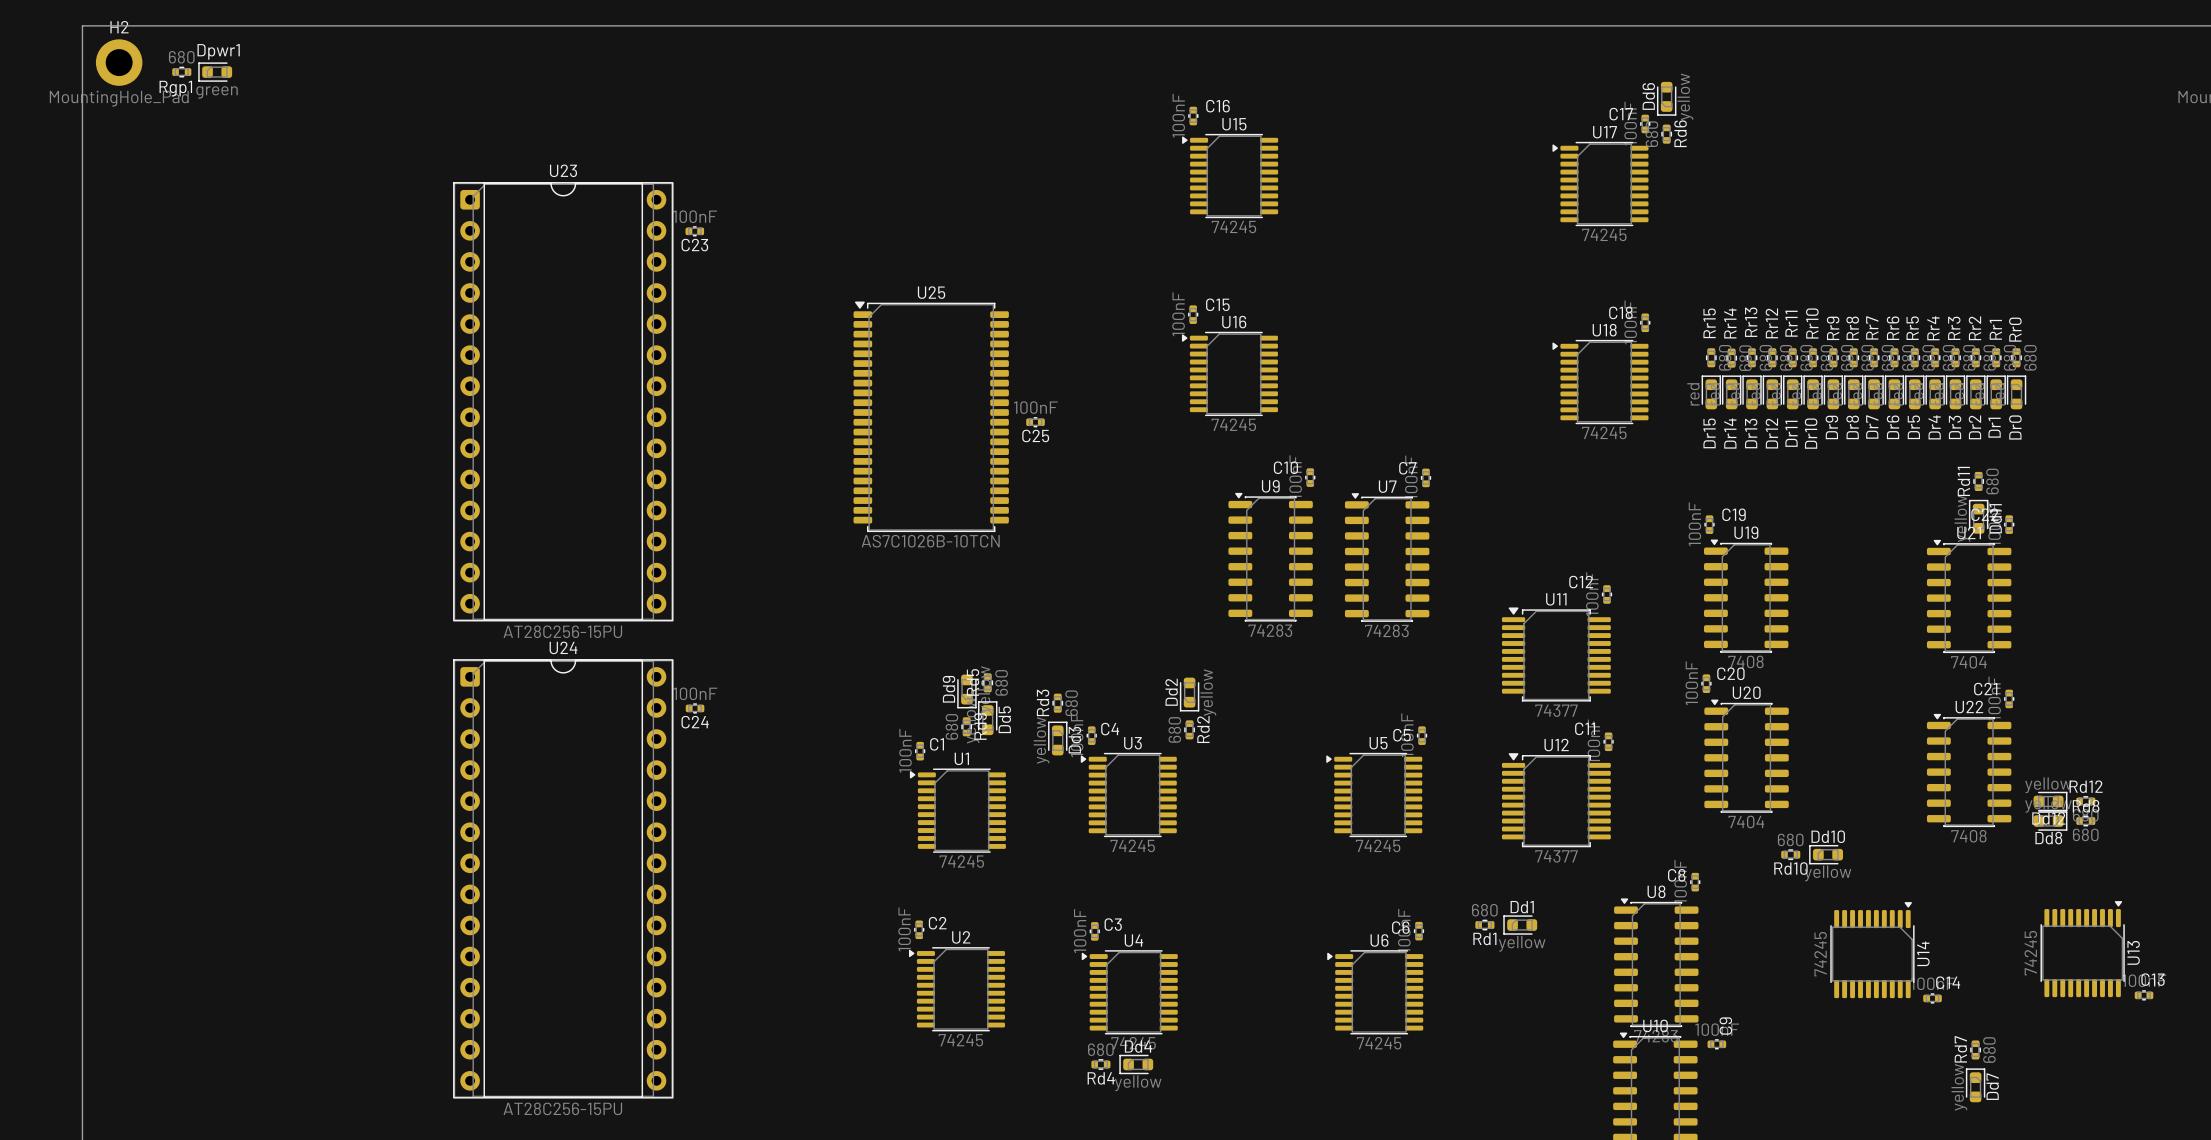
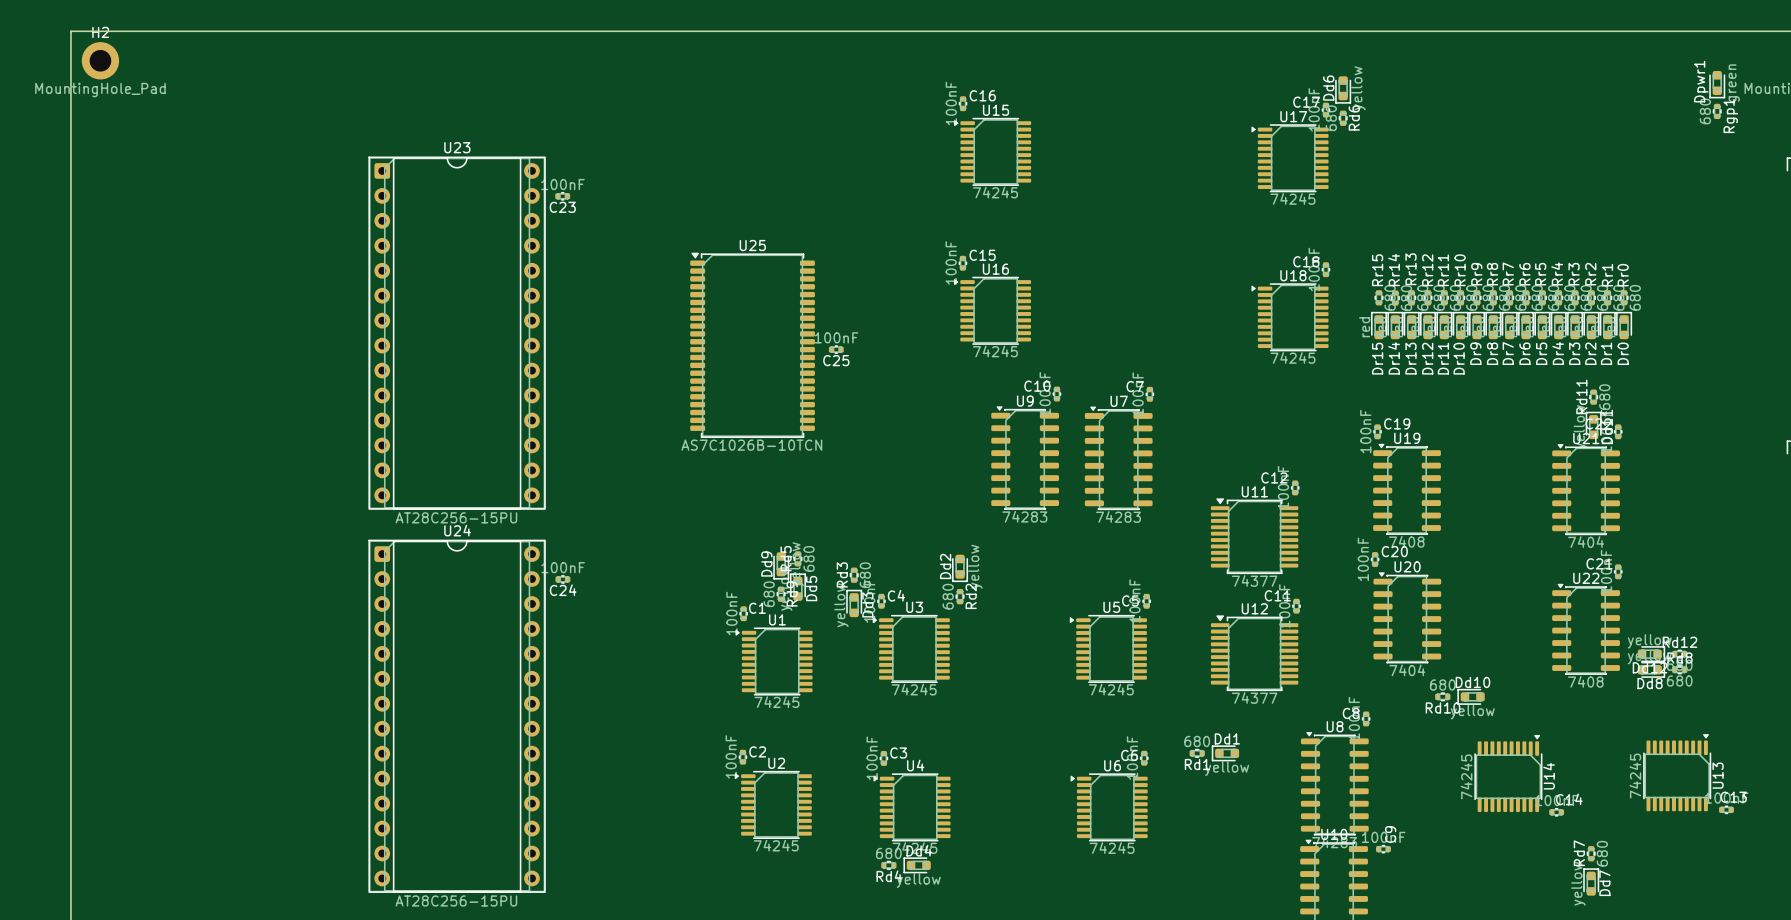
Rgp1 rotation: 0° (181, 72) -> 90° clockwise (1717, 111)
Rgp1 position: (181, 72) -> (1717, 111)
Dpwr1 rotation: 0° (215, 72) -> 90° counterclockwise (1717, 84)
Dpwr1 position: (215, 72) -> (1717, 84)

